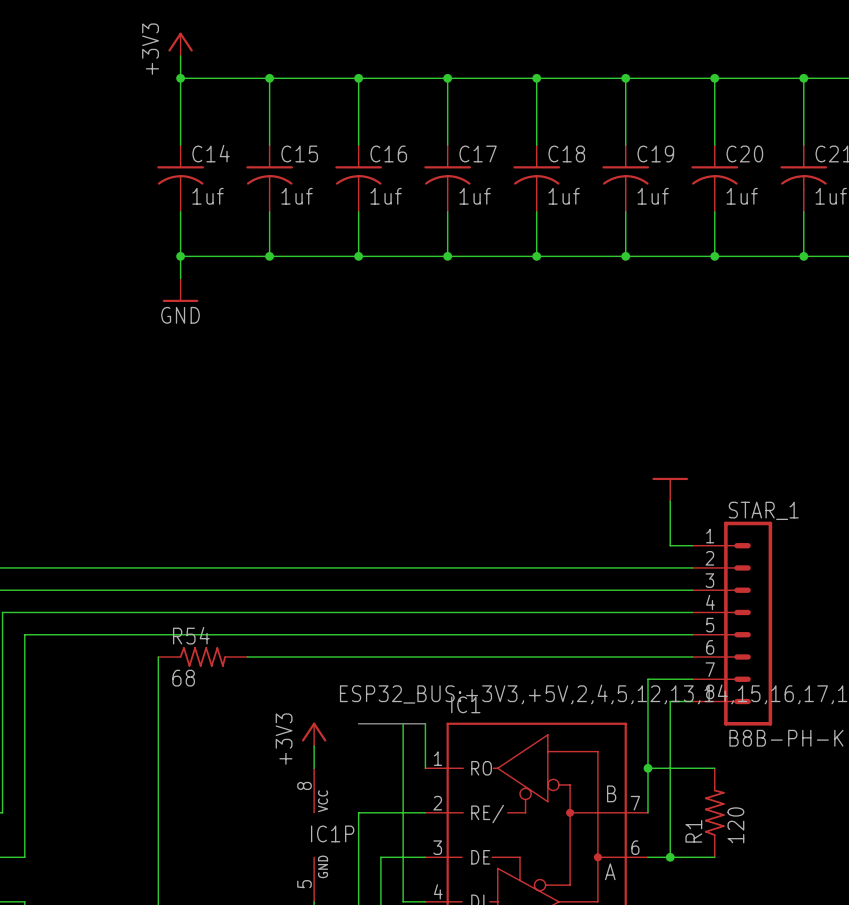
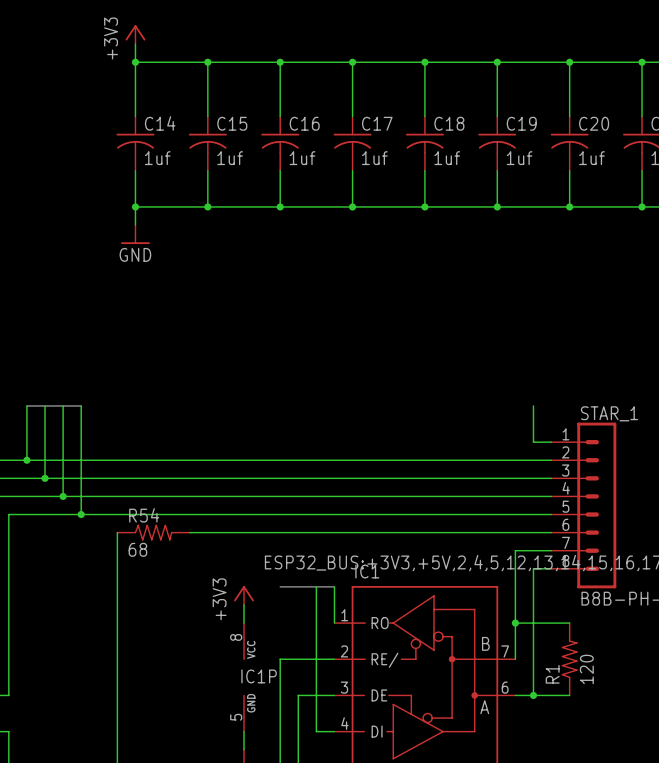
power symbol: (670, 489) -> none
bus: none -> (26, 405) (81, 405)
wire: none -> (26, 405) (26, 460)
wire: none -> (45, 405) (45, 478)
wire: none -> (63, 405) (63, 496)
wire: none -> (81, 405) (81, 514)
junction: none -> (26, 460)
junction: none -> (45, 478)
junction: none -> (63, 496)
junction: none -> (81, 514)

